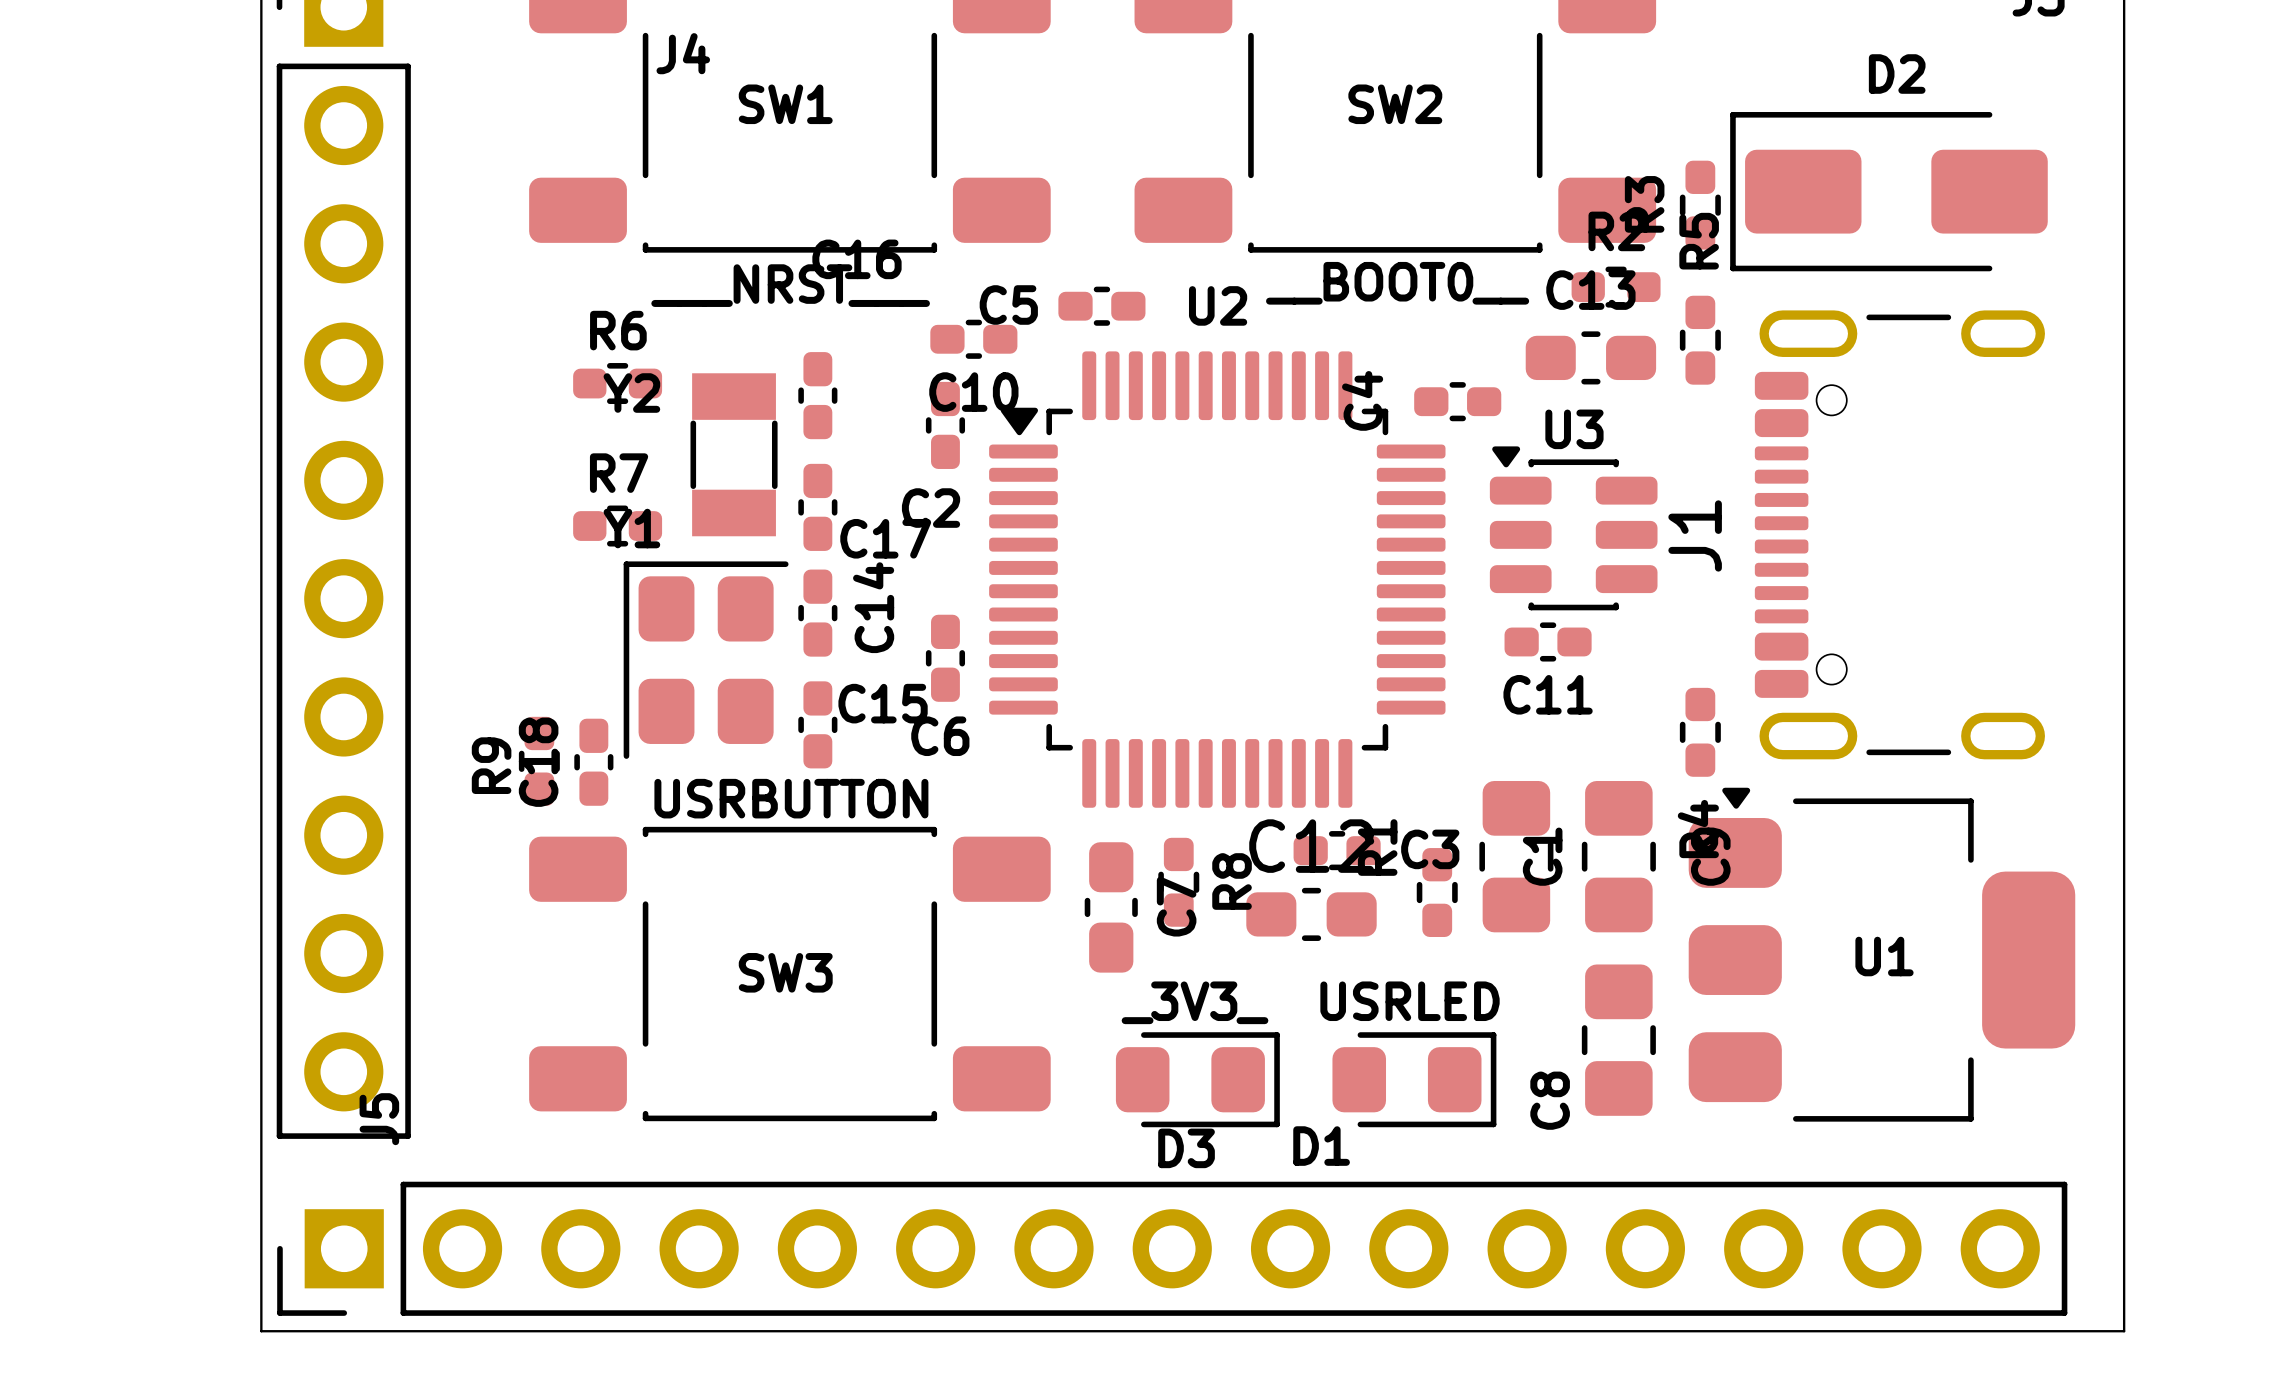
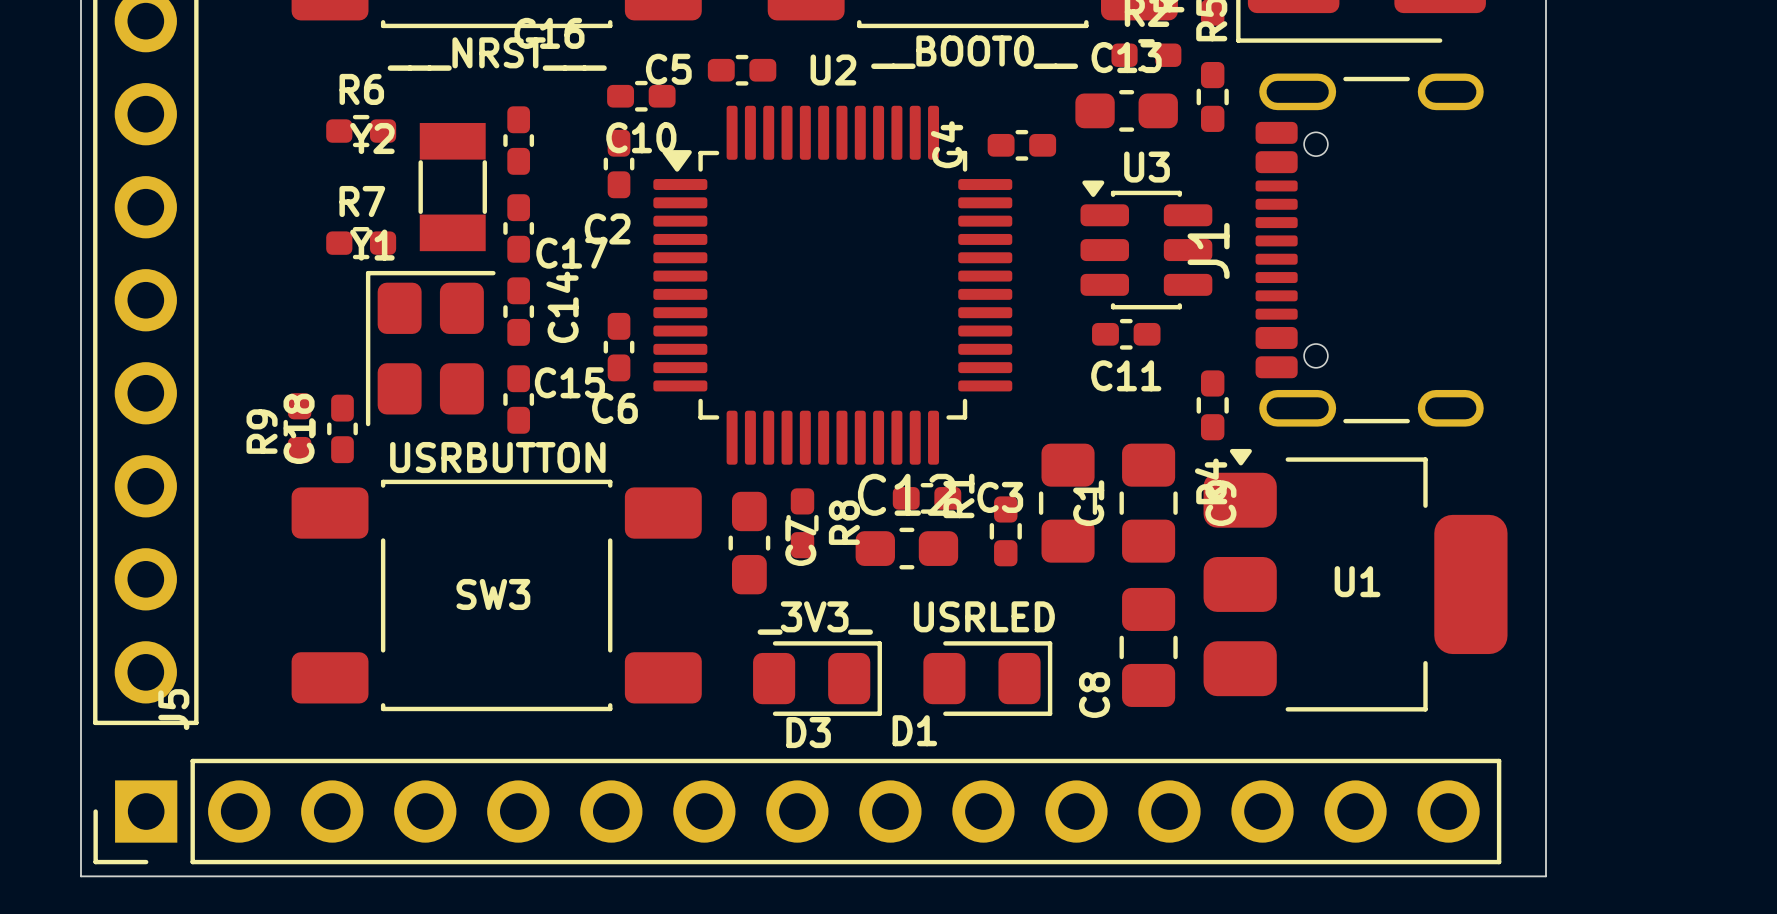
U3 position: (1573, 528) -> (1146, 244)
C11 position: (1548, 641) -> (1126, 334)

